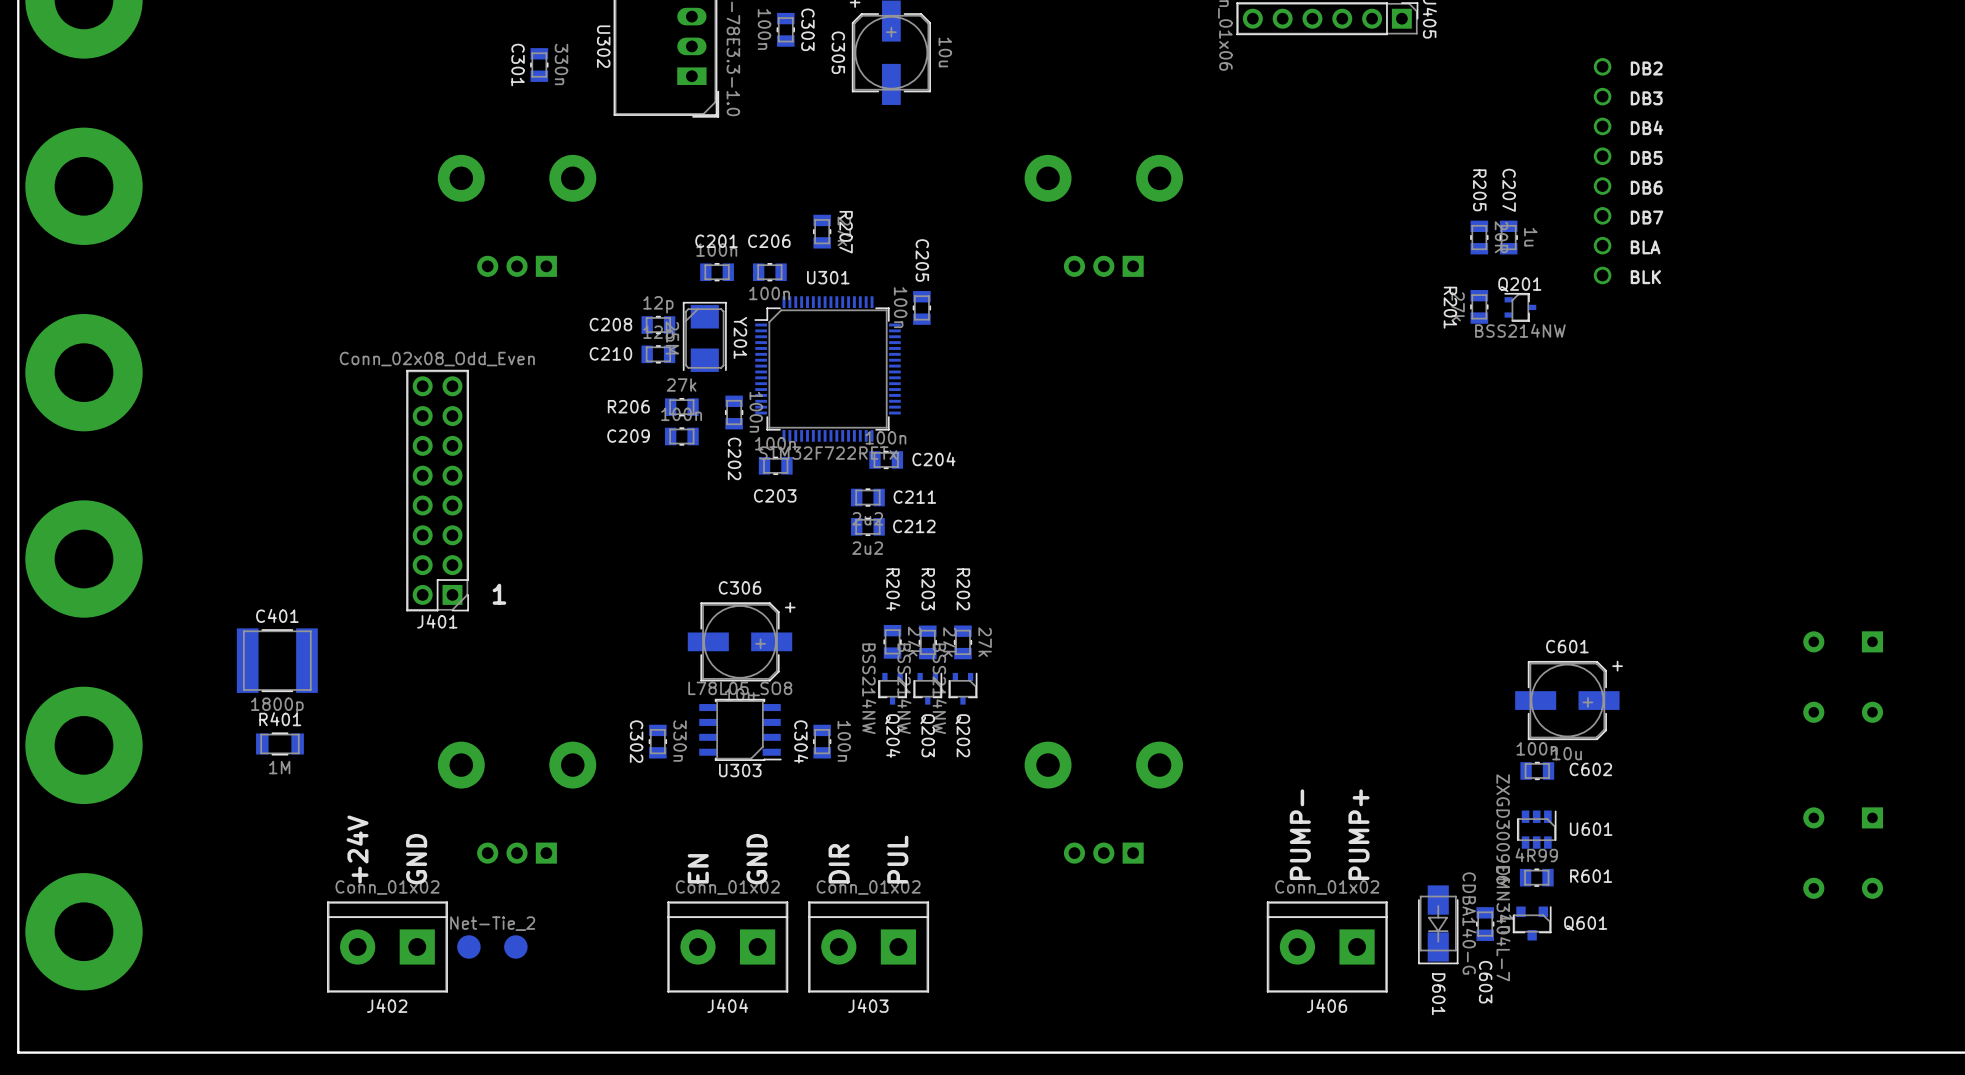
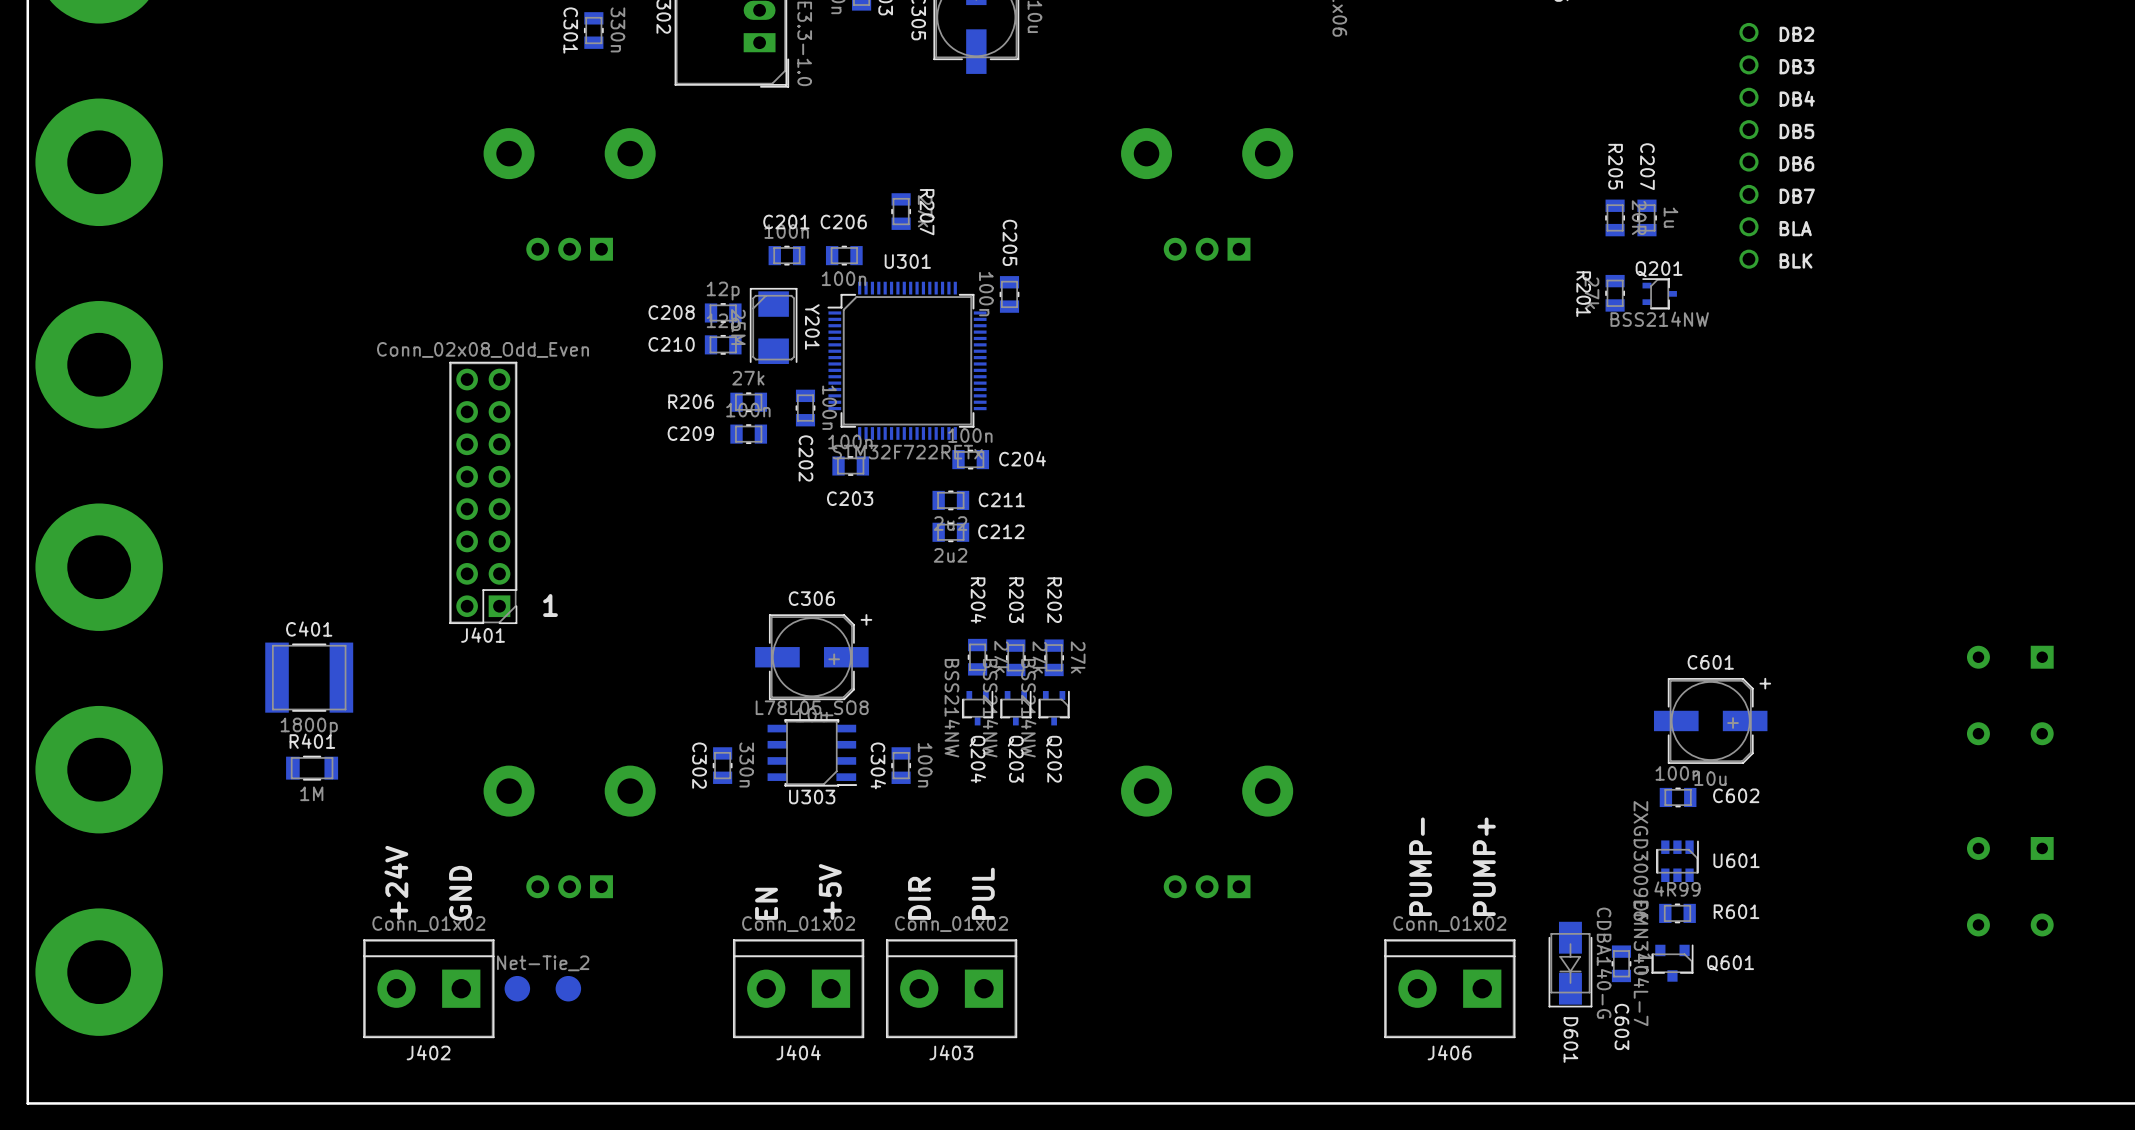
text: GND (756, 859) -> +5V (830, 891)

